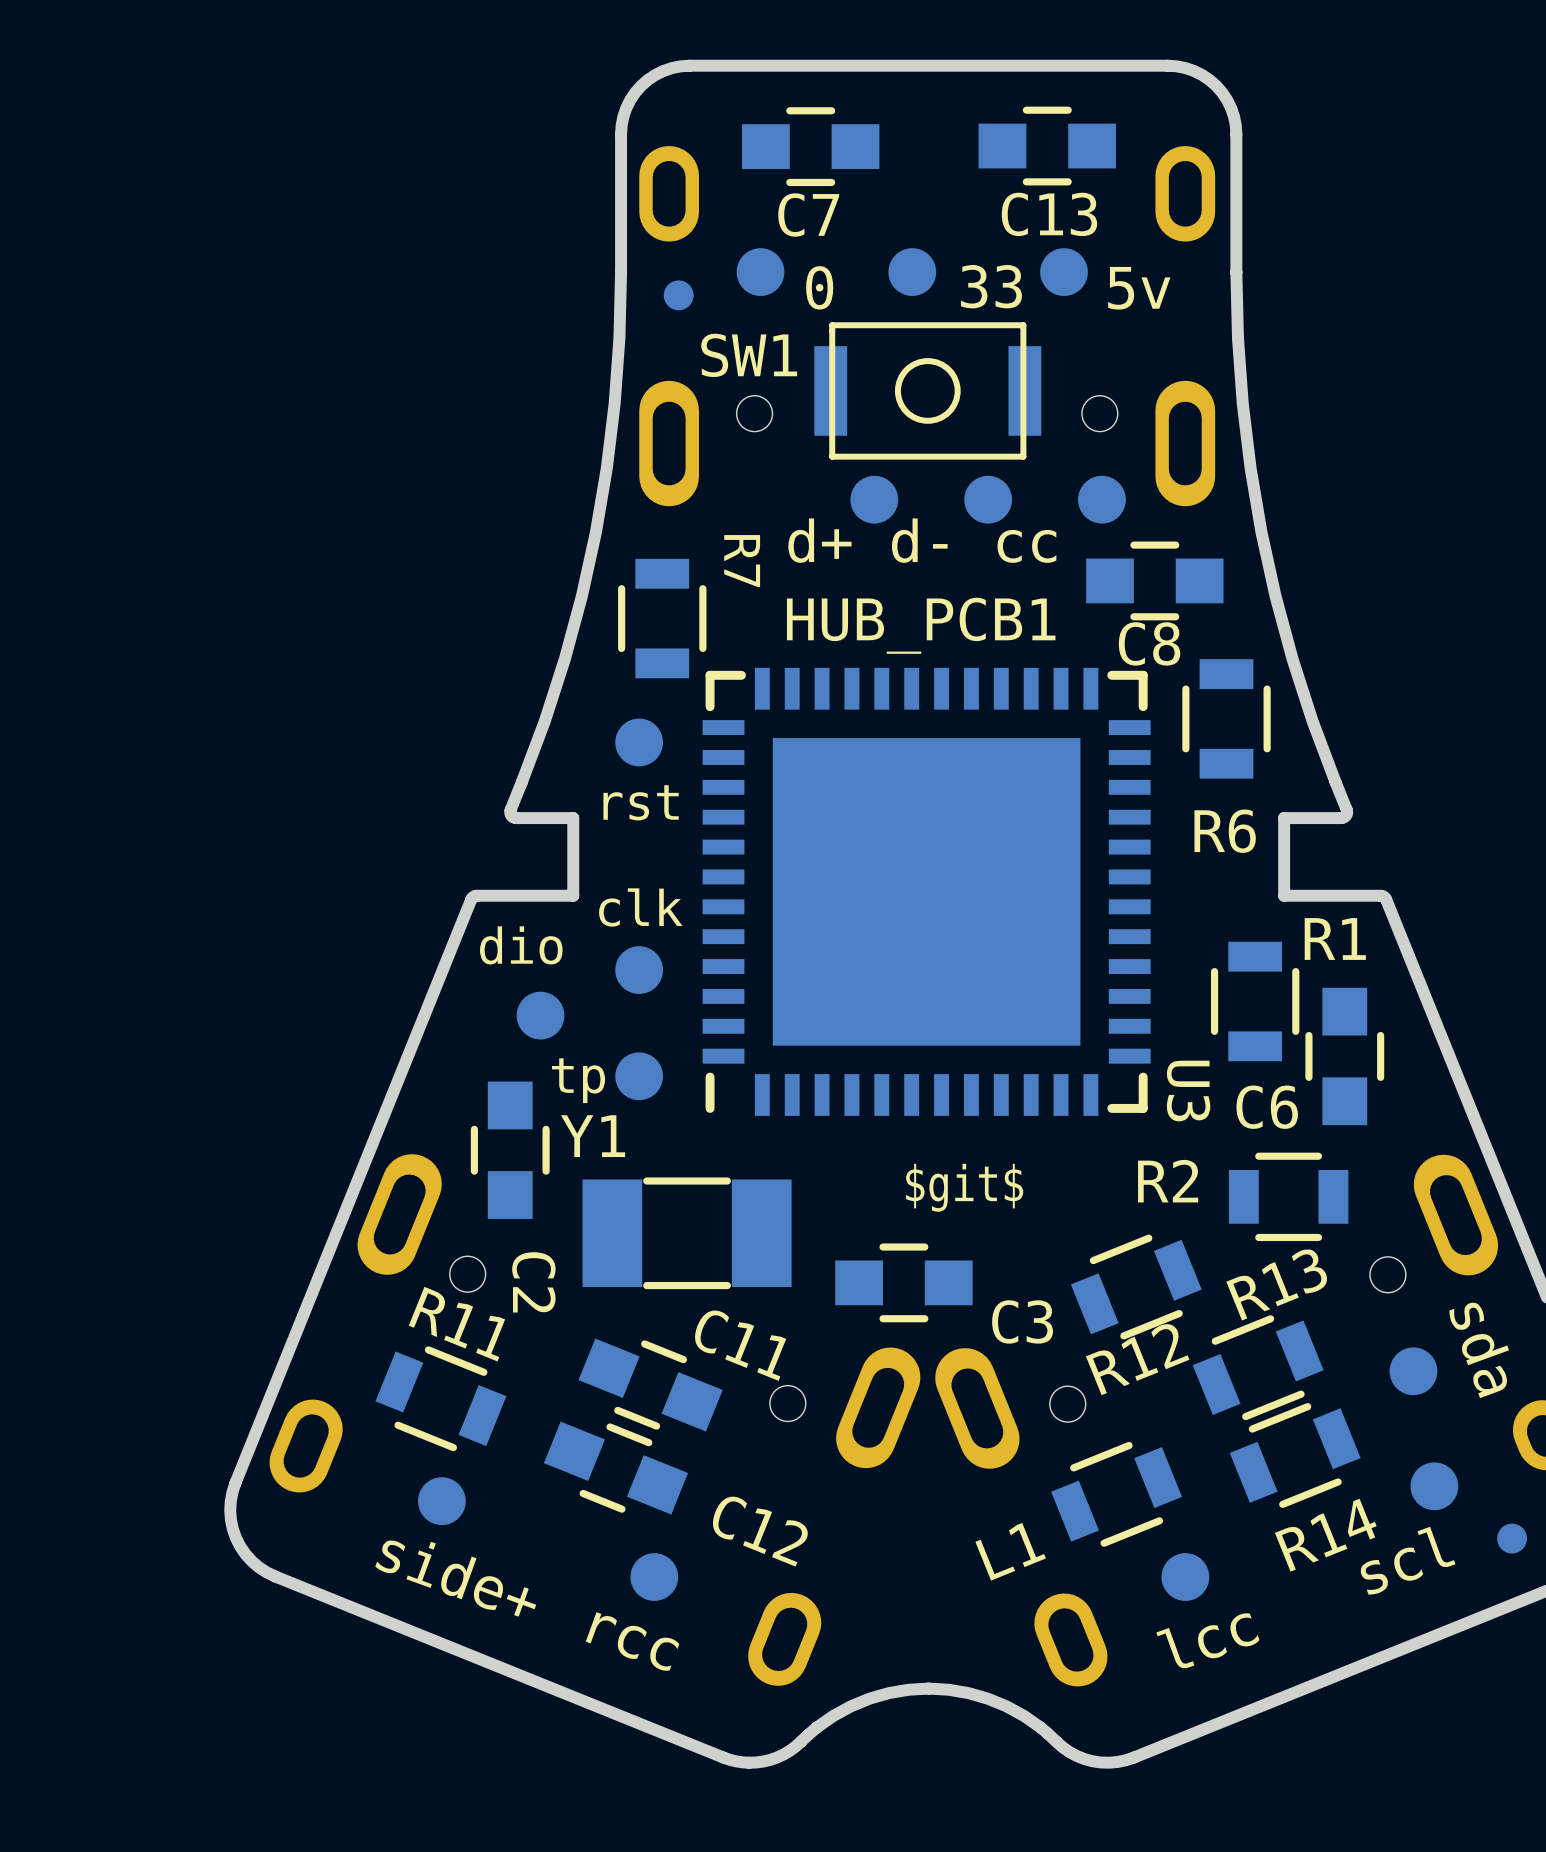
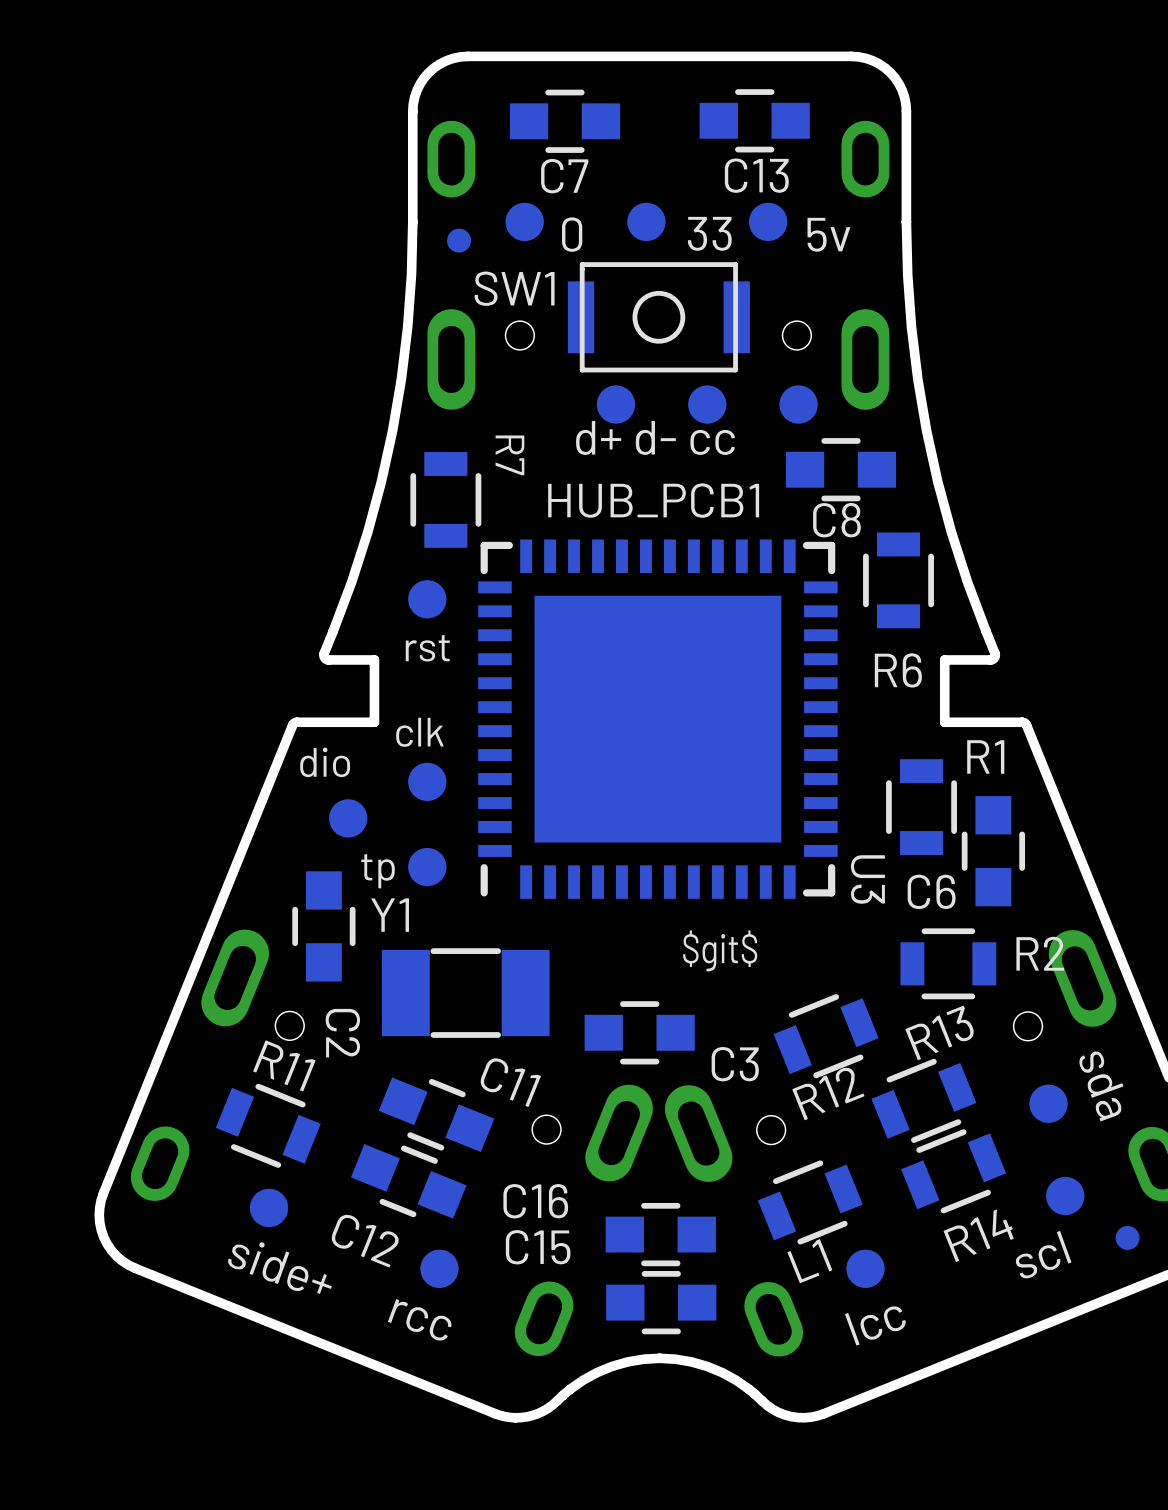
R2 name position: R2 (1168, 1181) -> R2 (1040, 953)
text position: $git$ (964, 1187) -> $git$ (720, 950)
C12 name position: C12 (760, 1530) -> C12 (365, 1241)
C16: none -> (660, 1234)
L1 name position: L1 (1010, 1551) -> L1 (809, 1261)
C15: none -> (661, 1302)

